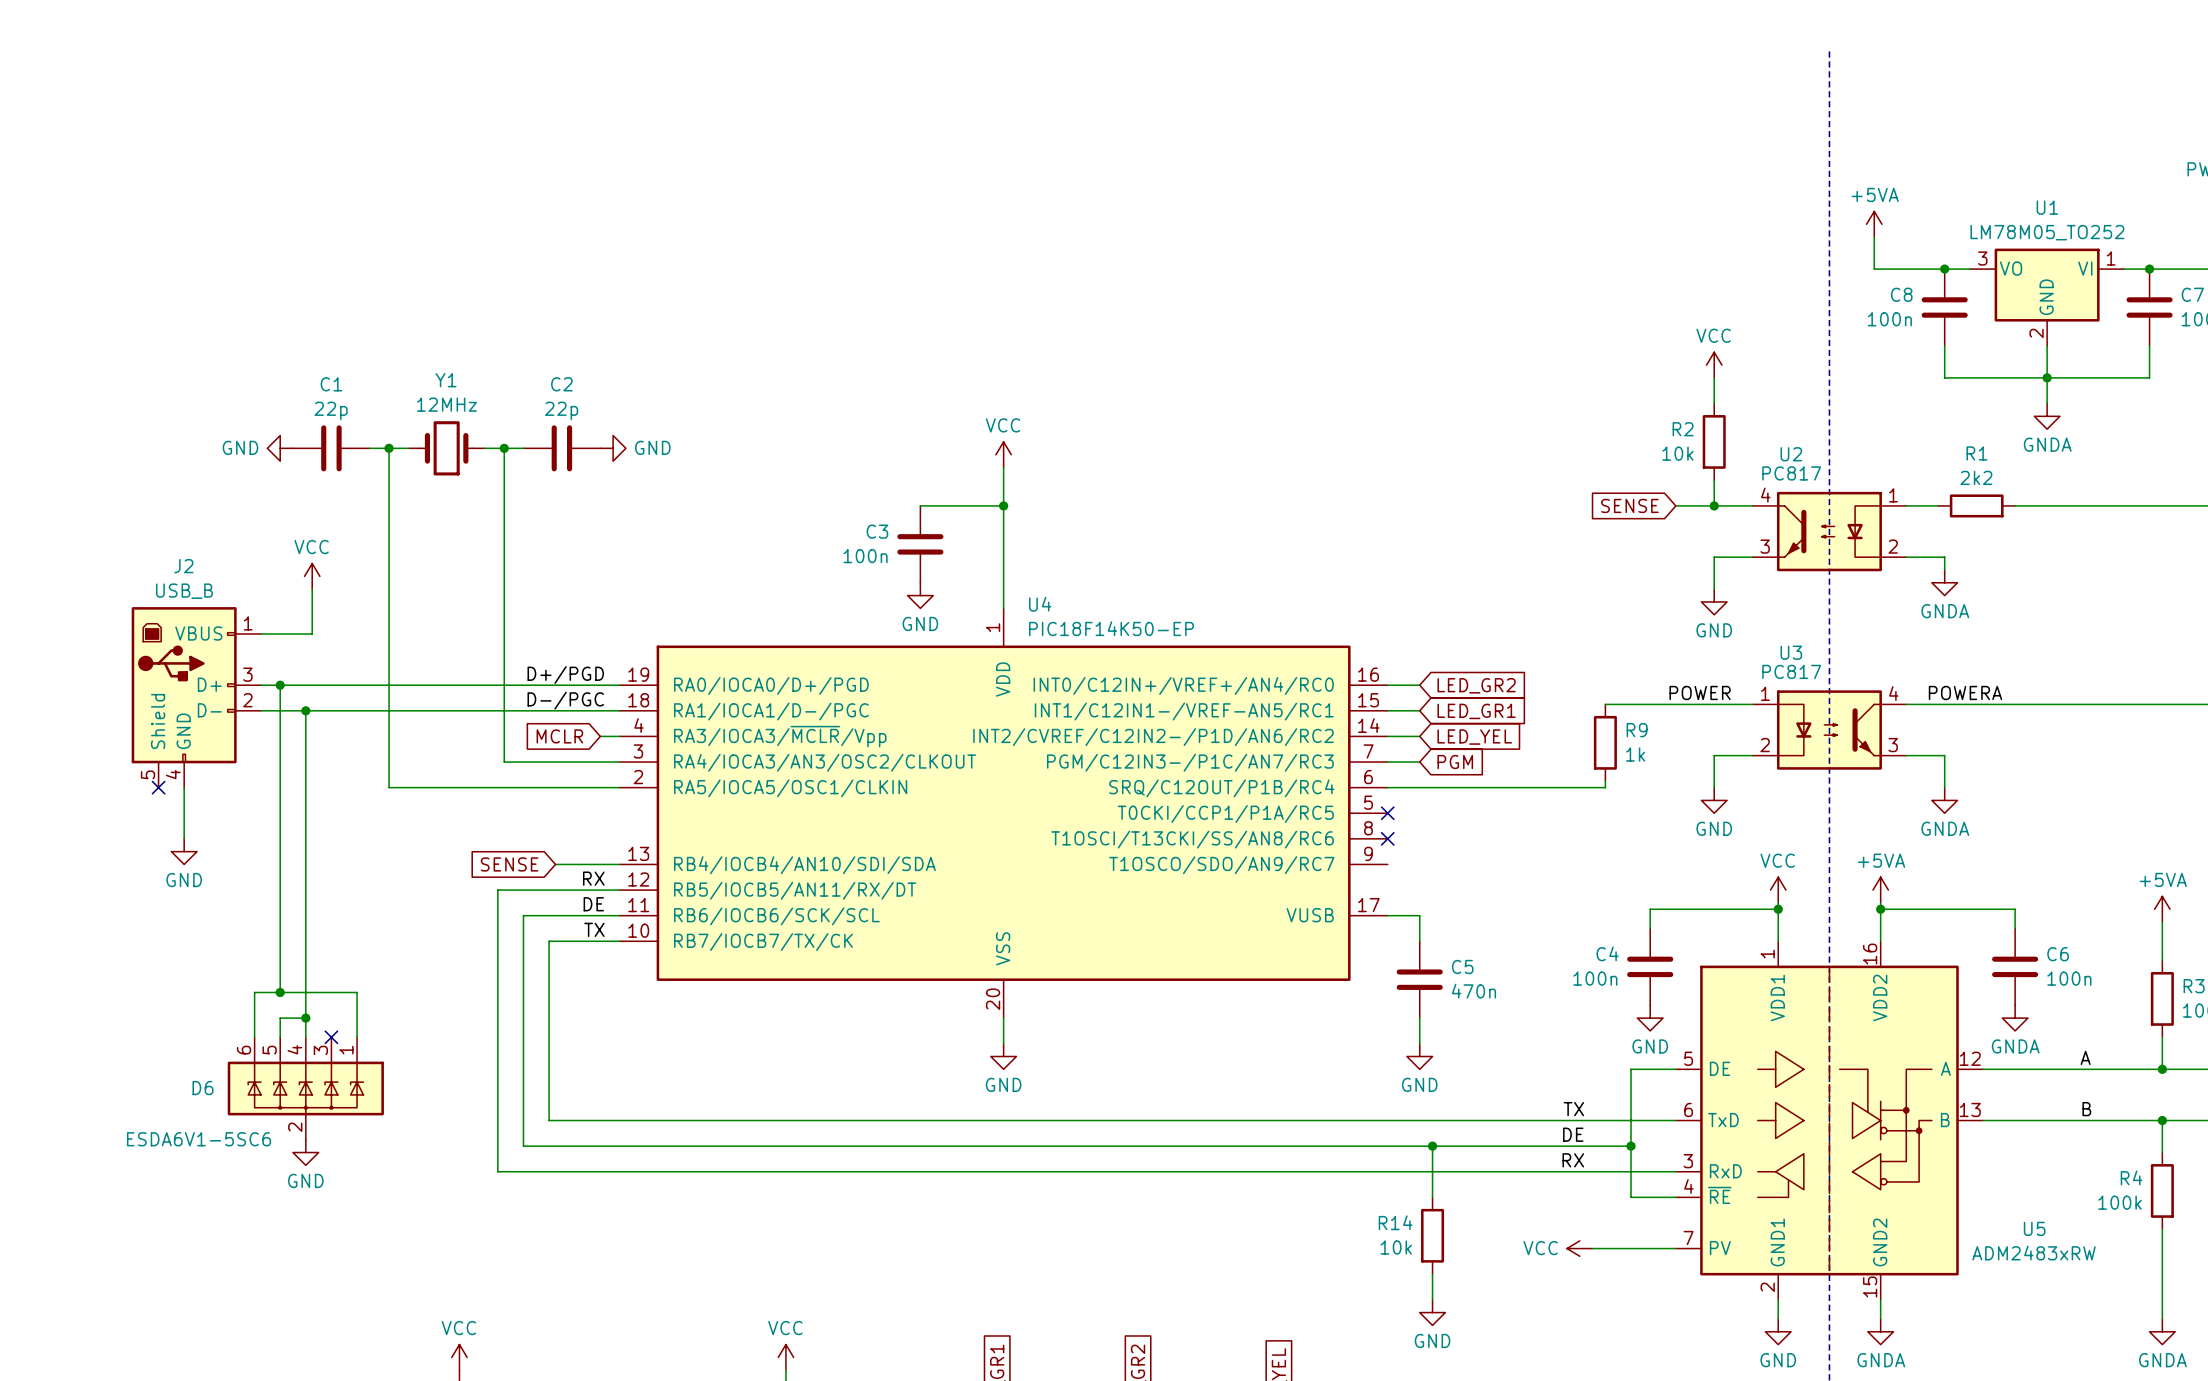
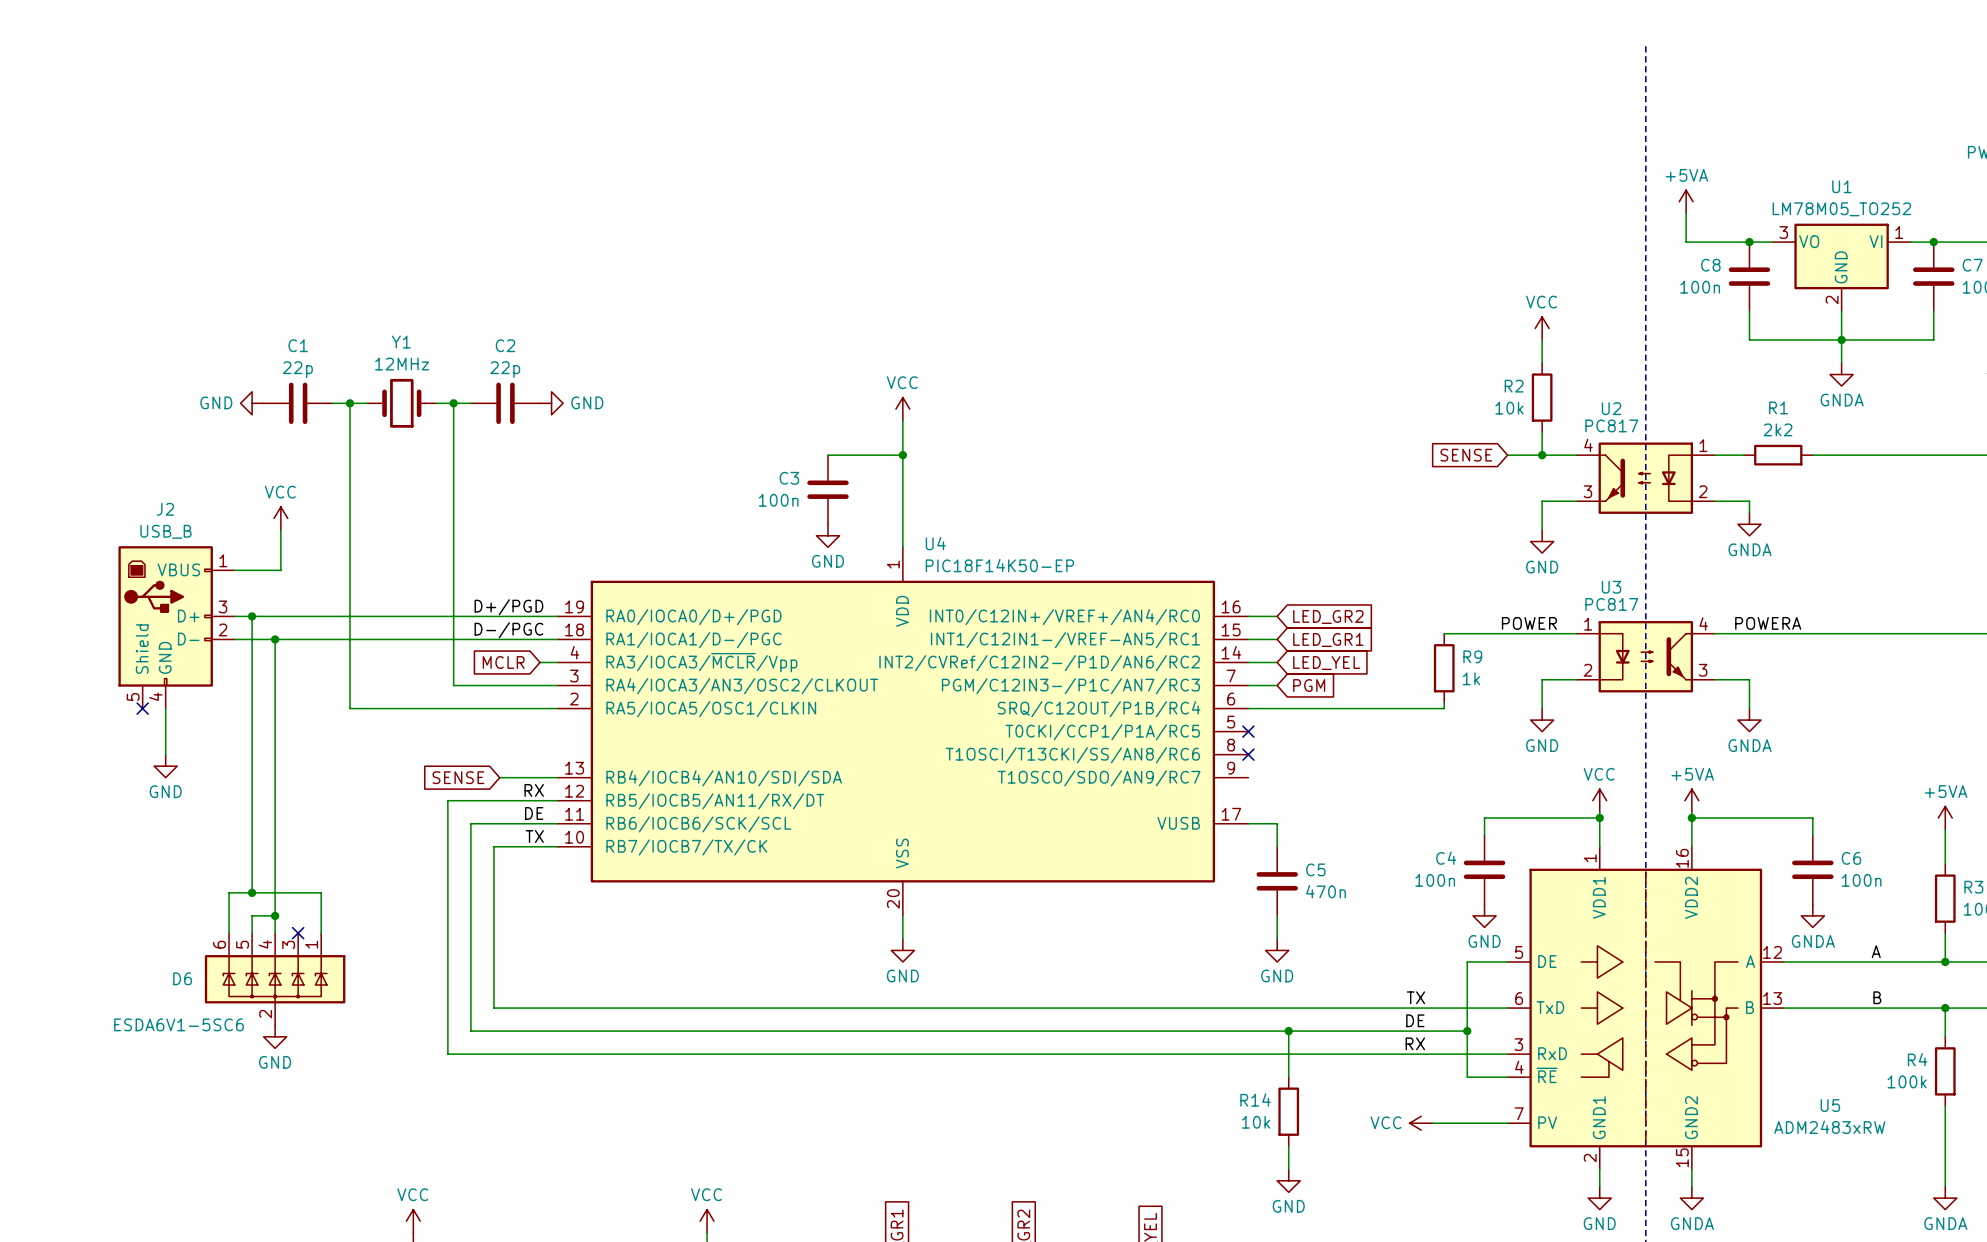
U4 pin name: INT2/CVREF/C12IN2-/P1D/AN6/RC2 (1153, 737) -> INT2/CVRef/C12IN2-/P1D/AN6/RC2 (1039, 663)

